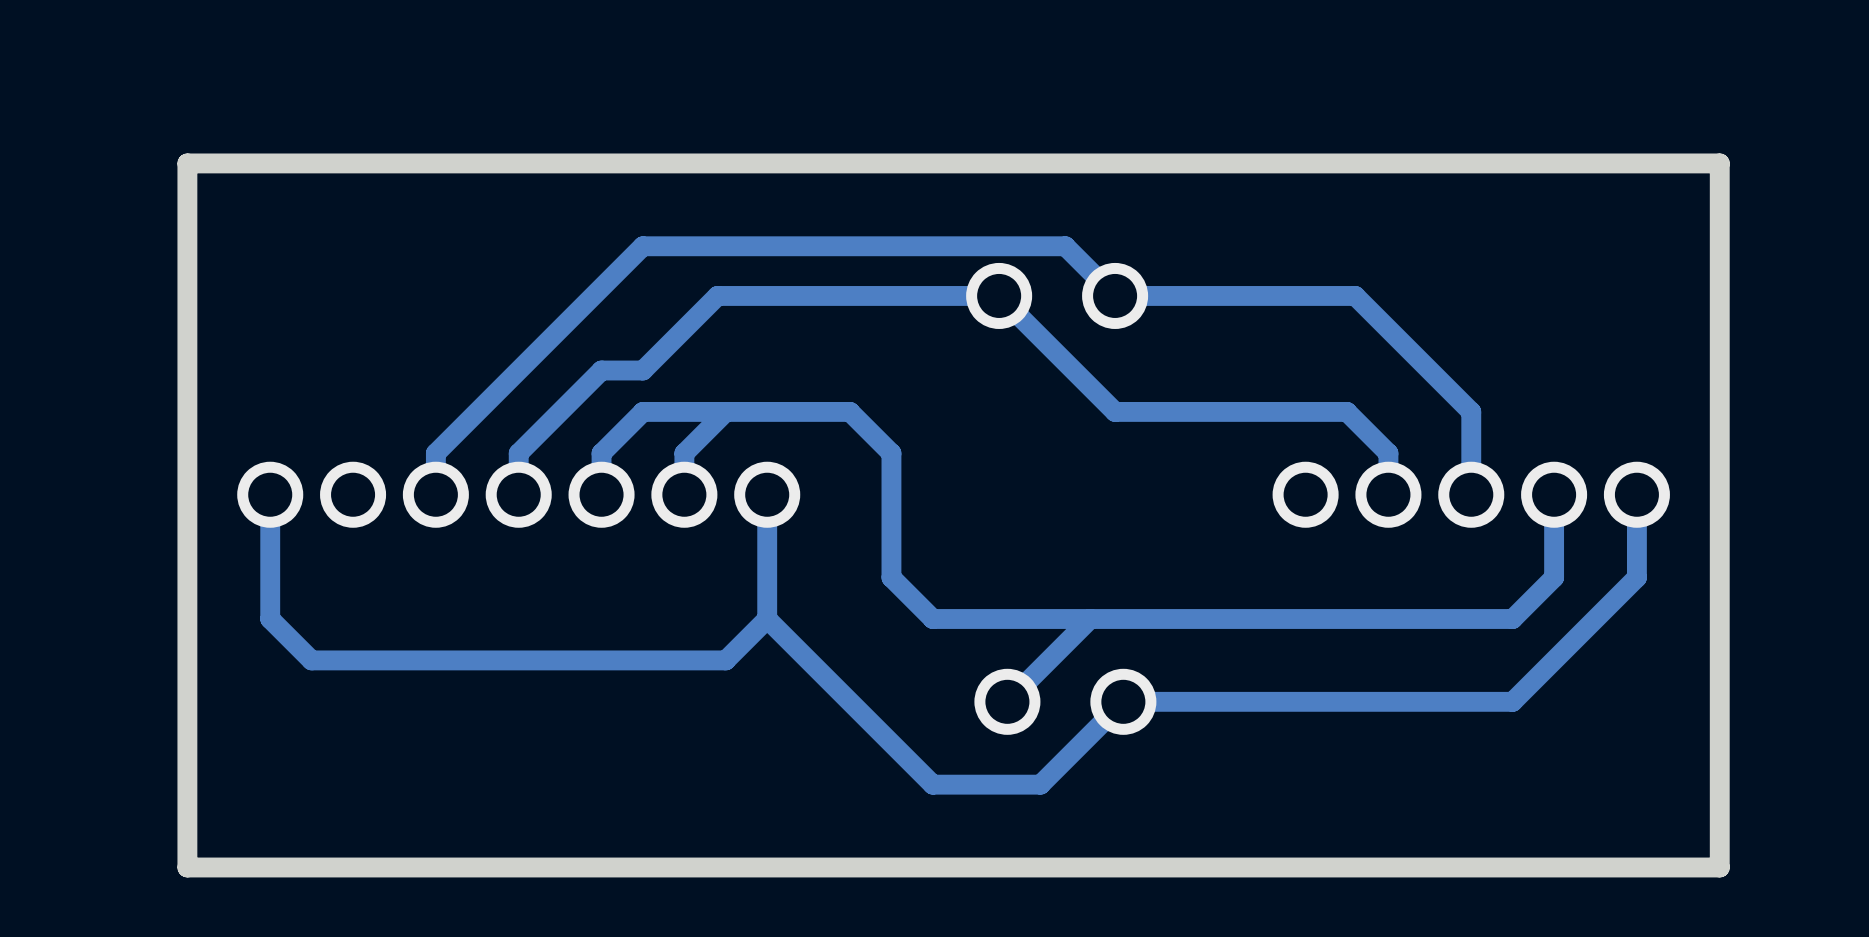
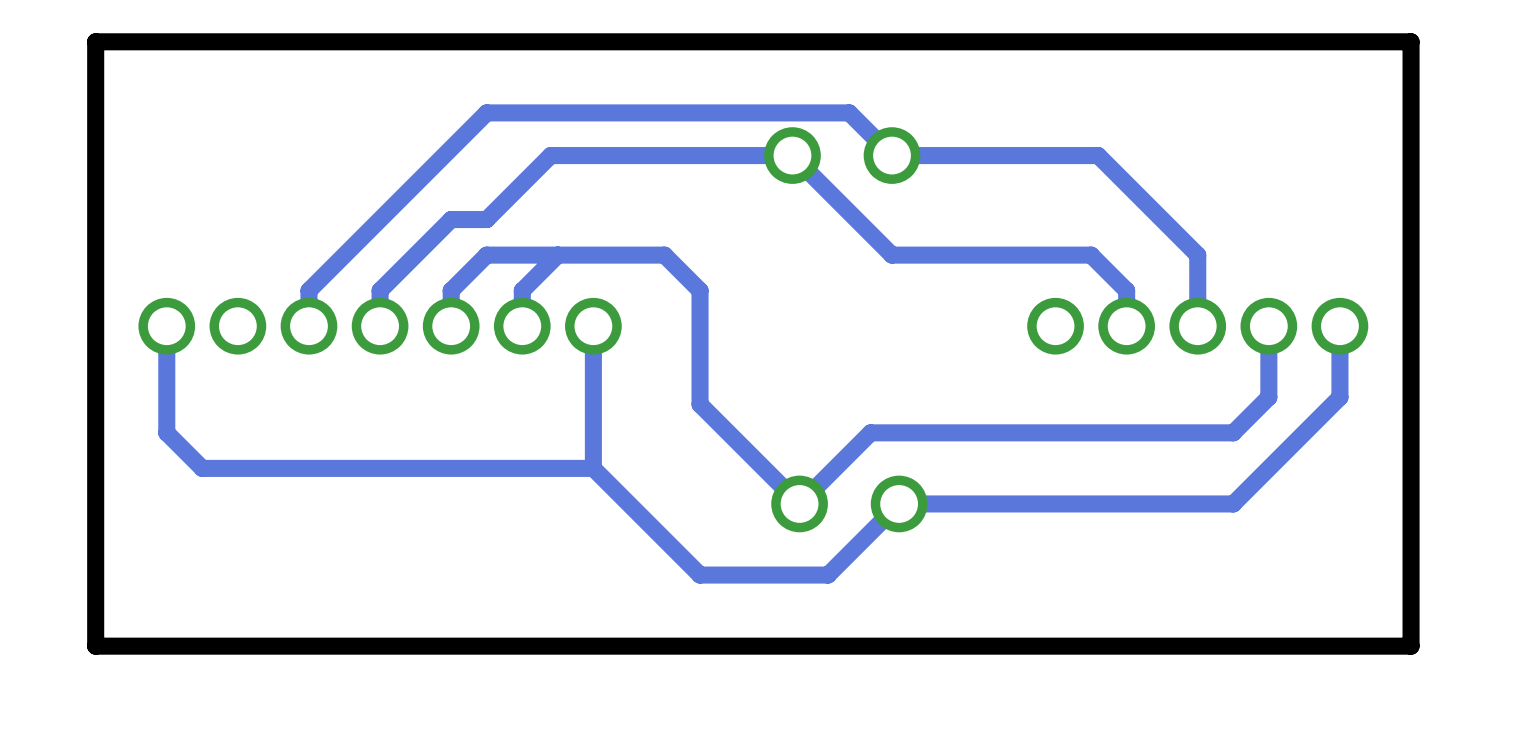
bottom track: (891, 577) (932, 619) (1090, 619) -> (700, 397) (700, 404) (799, 503)
bottom track: none -> (593, 432) (593, 468)
bottom track: (725, 660) (767, 619) (932, 784) -> (593, 468) (700, 575) (735, 575)
bottom track: none -> (593, 468) (557, 468)

